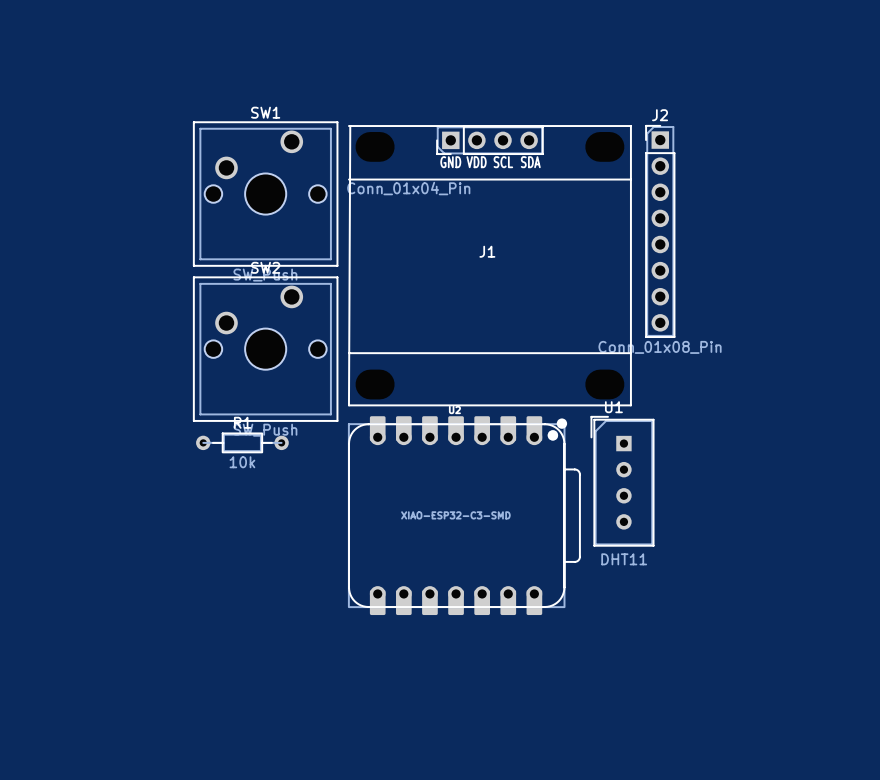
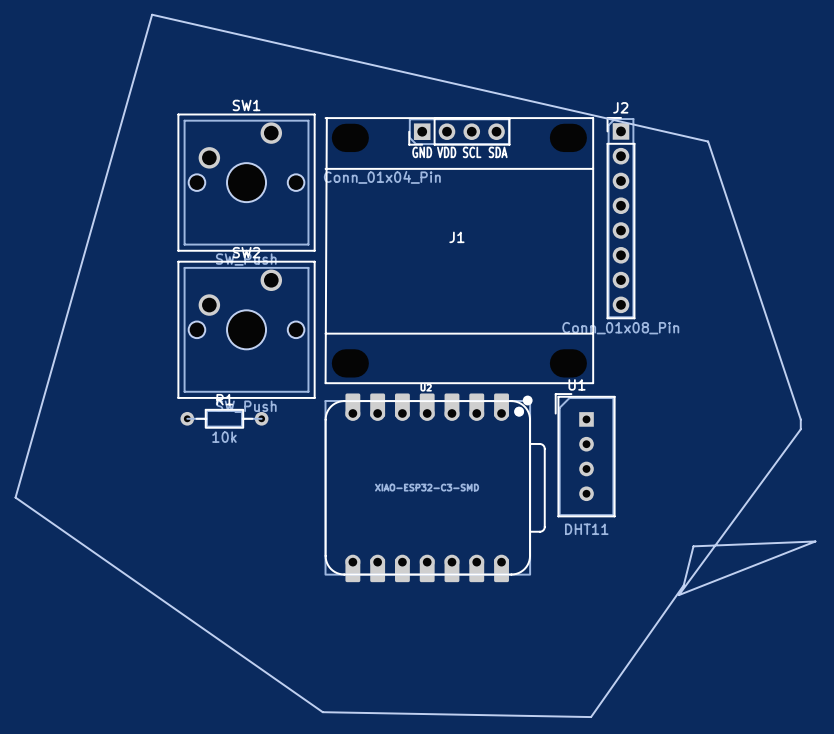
board edge: none -> (152, 14) (15, 497) (322, 712) (591, 717) (683, 585) (693, 546) (815, 541) (678, 595) (800, 429) (800, 419) (708, 141) (152, 14)

